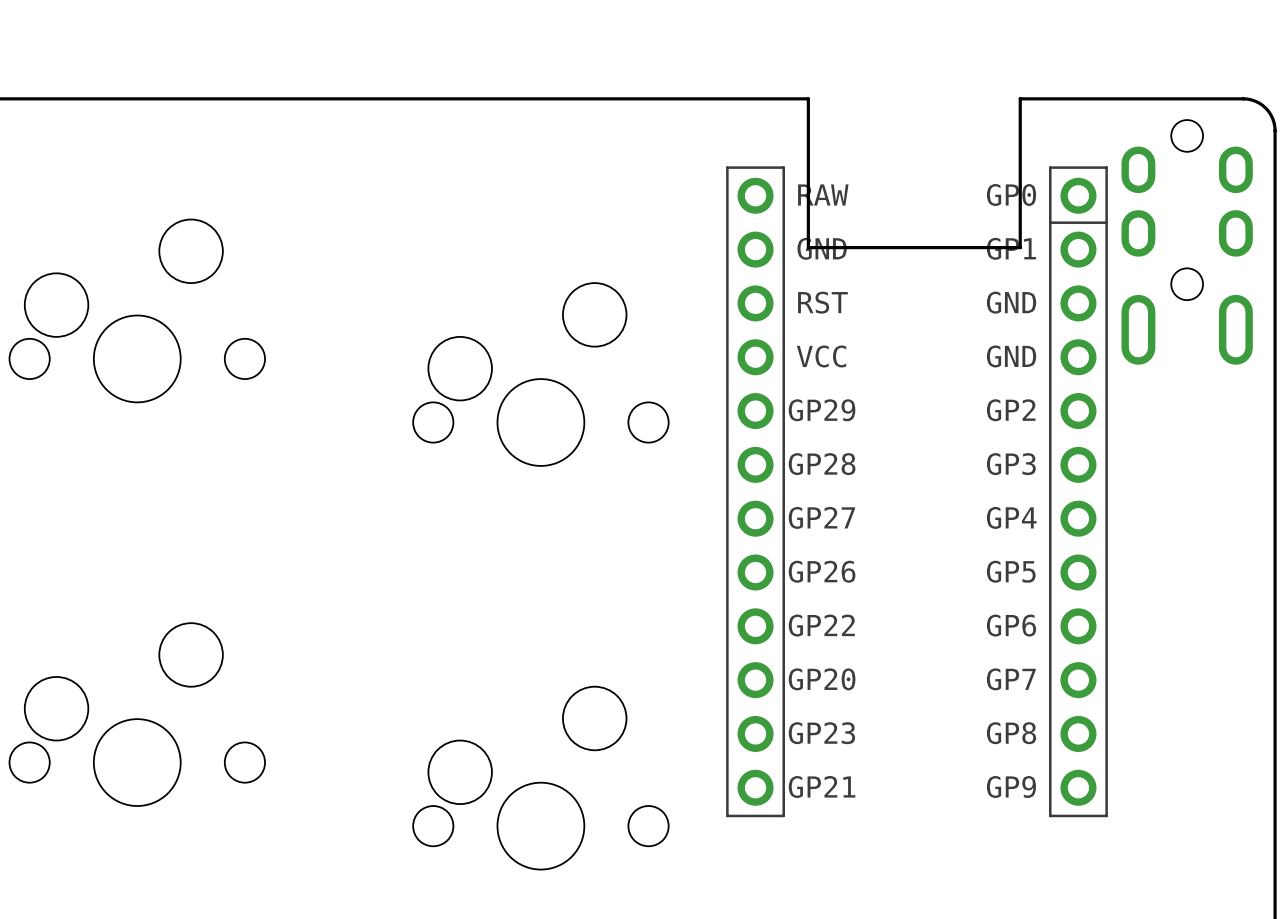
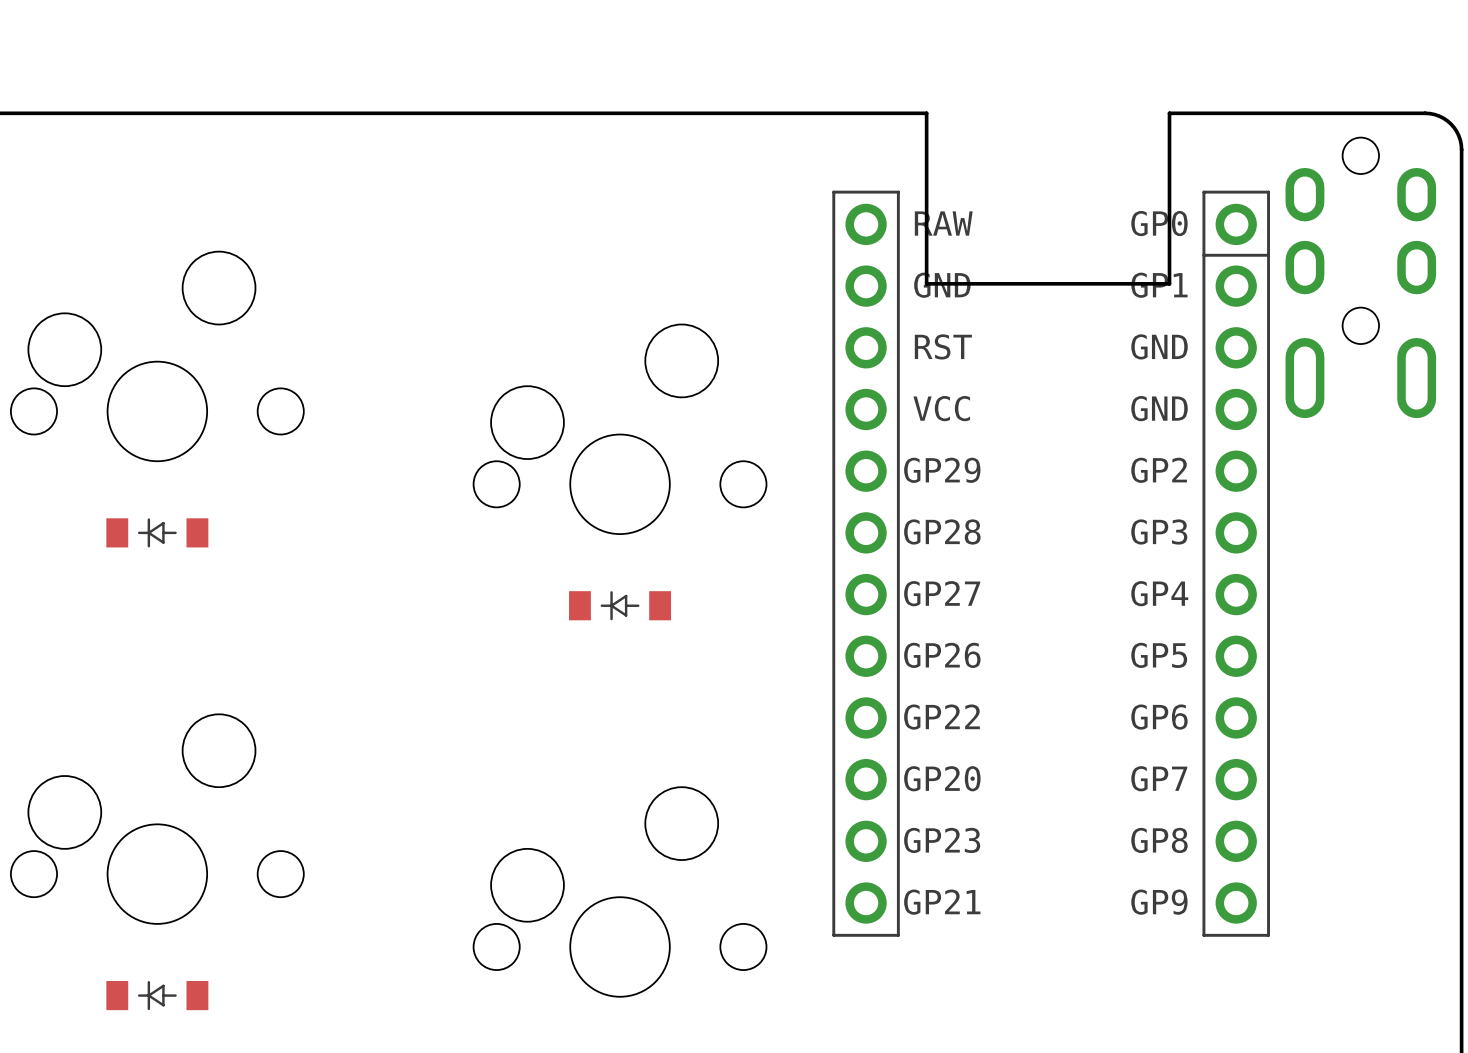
part: none -> (157, 532)
part: none -> (620, 605)
part: none -> (157, 995)

